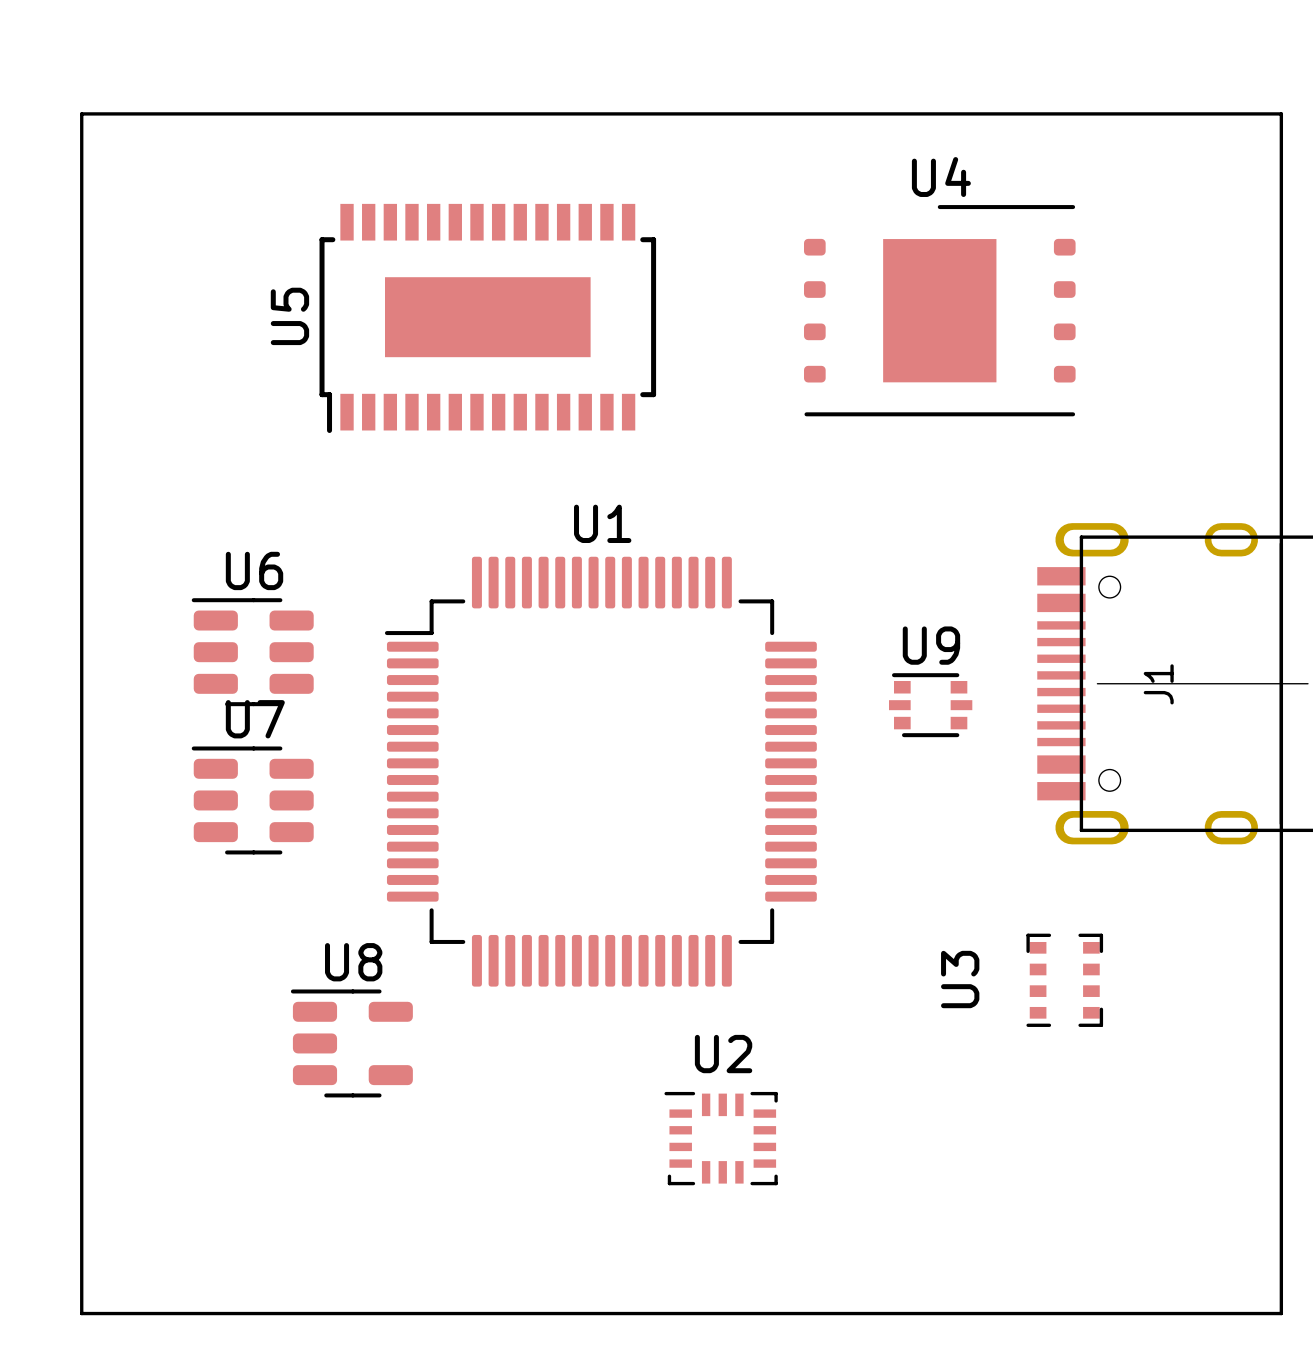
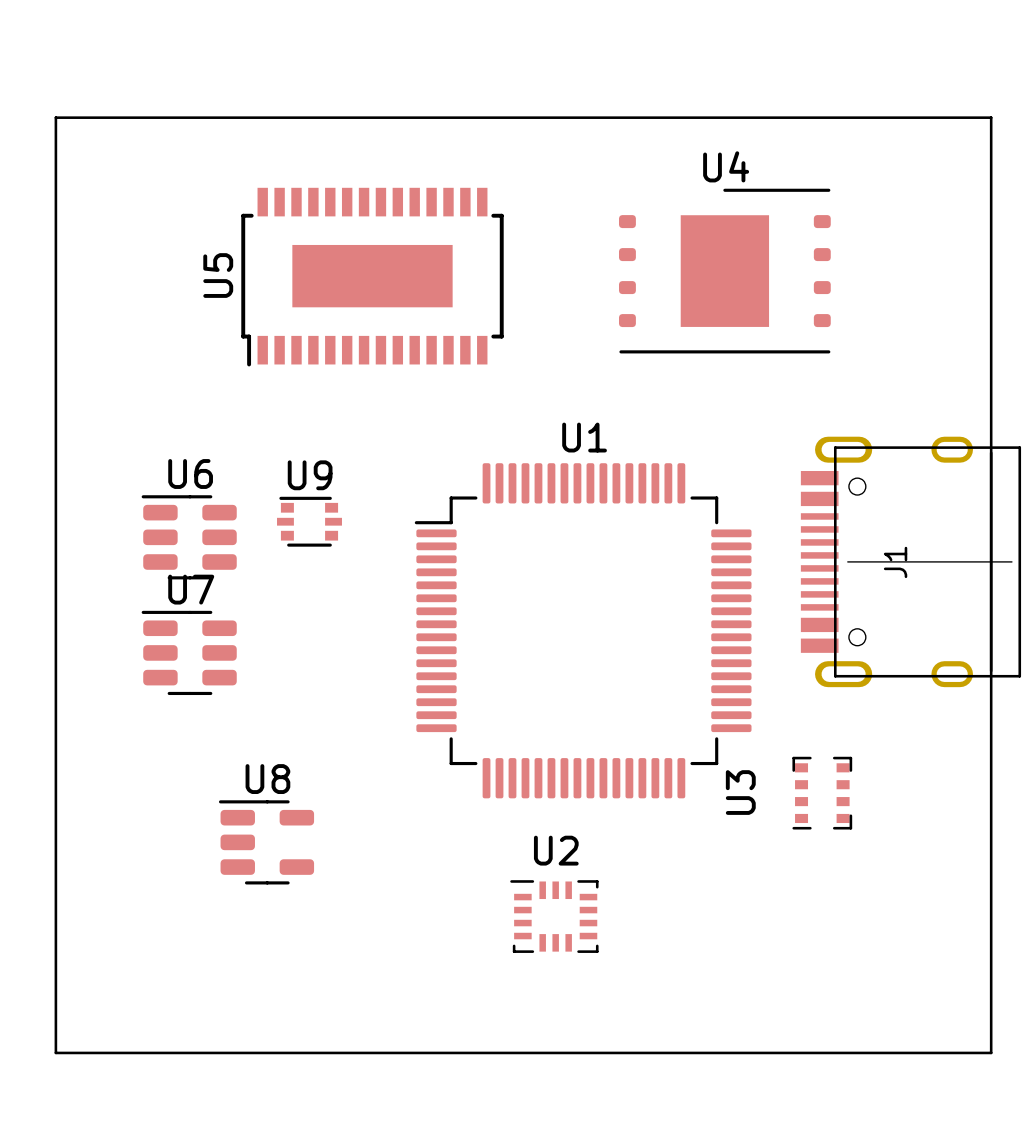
U9 position: (930, 705) -> (309, 521)
U1 position: (600, 771) -> (583, 630)

